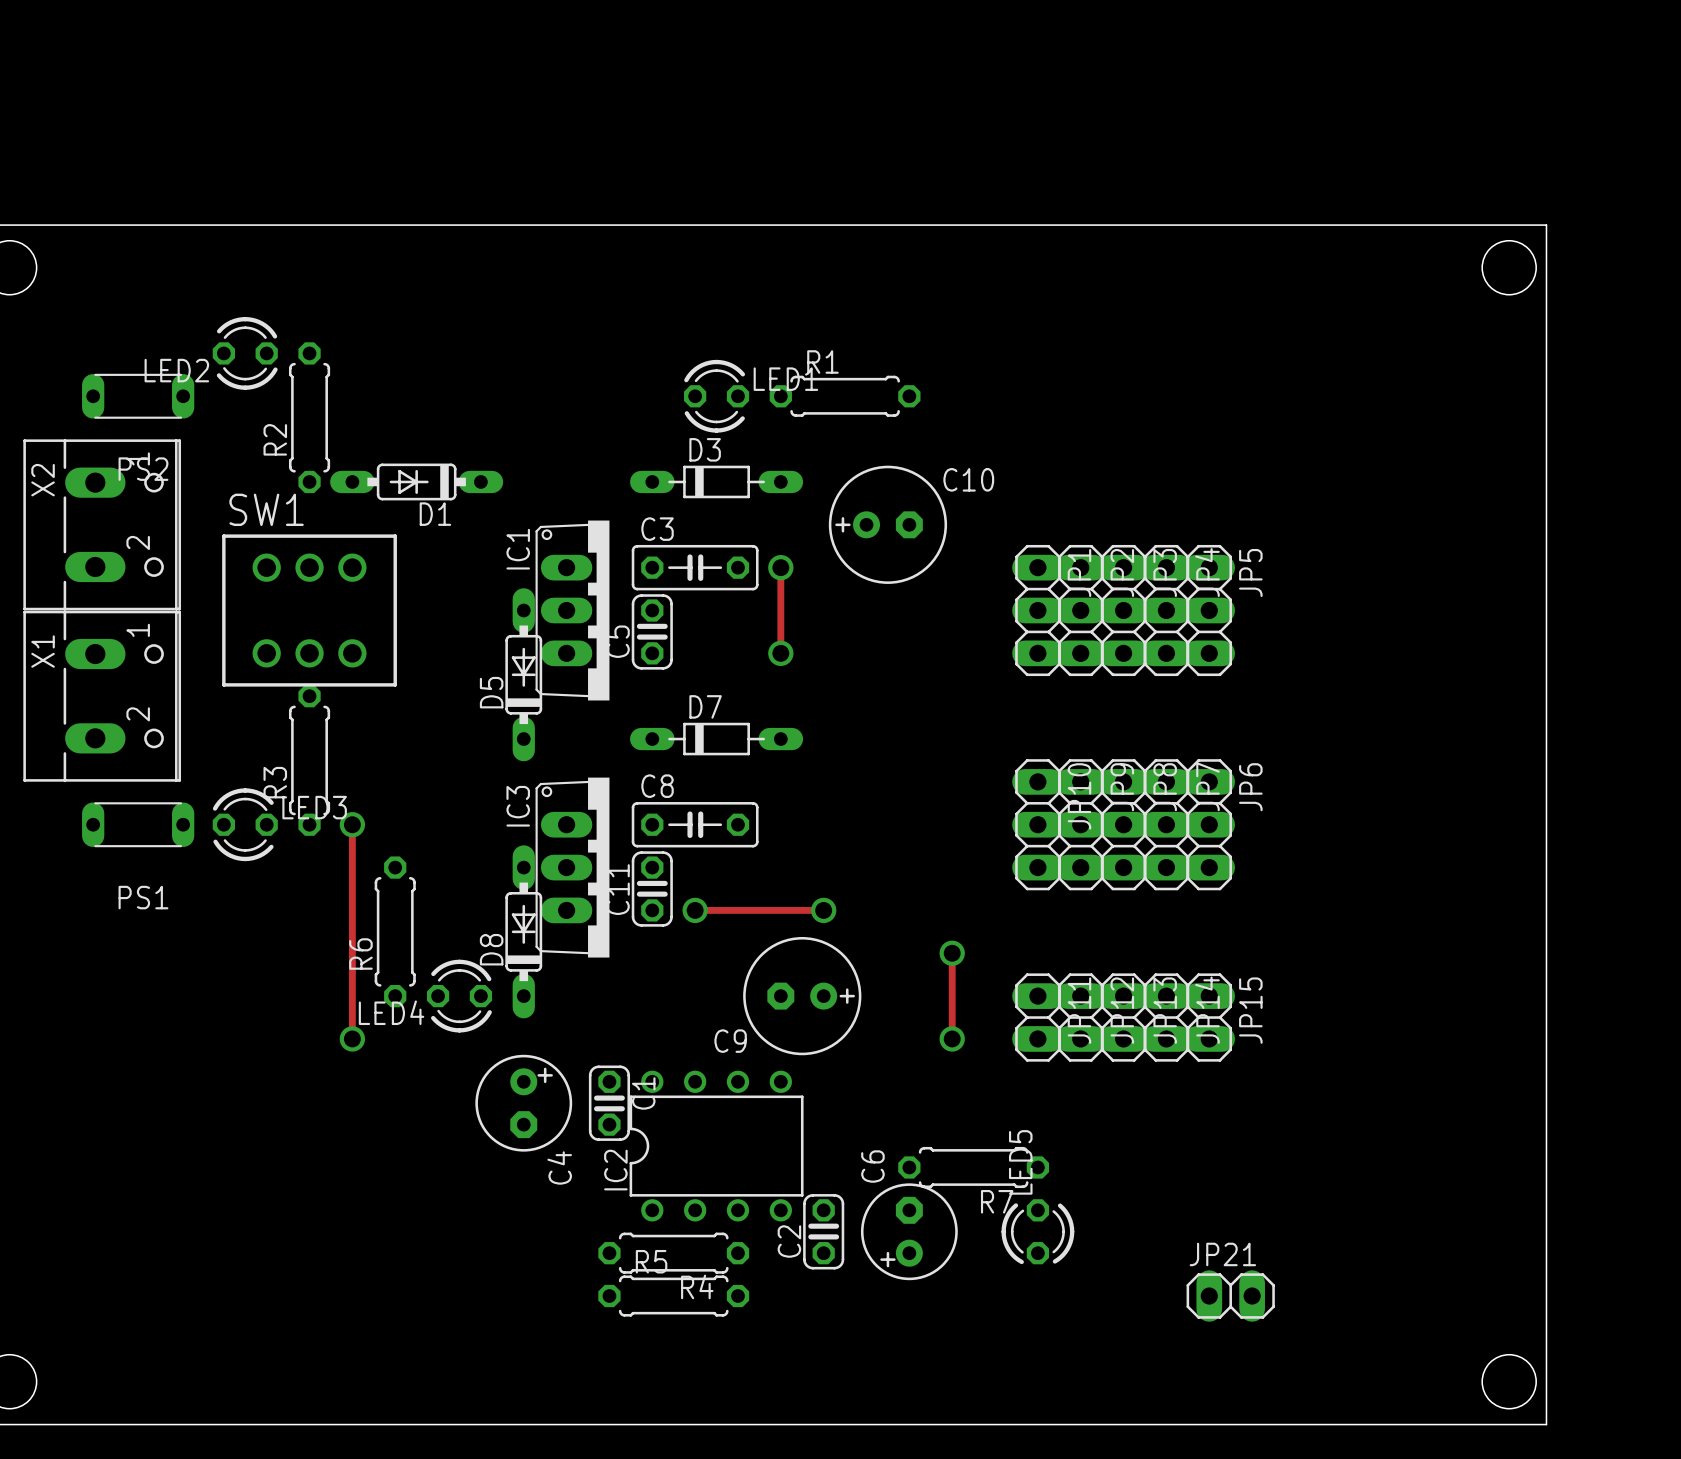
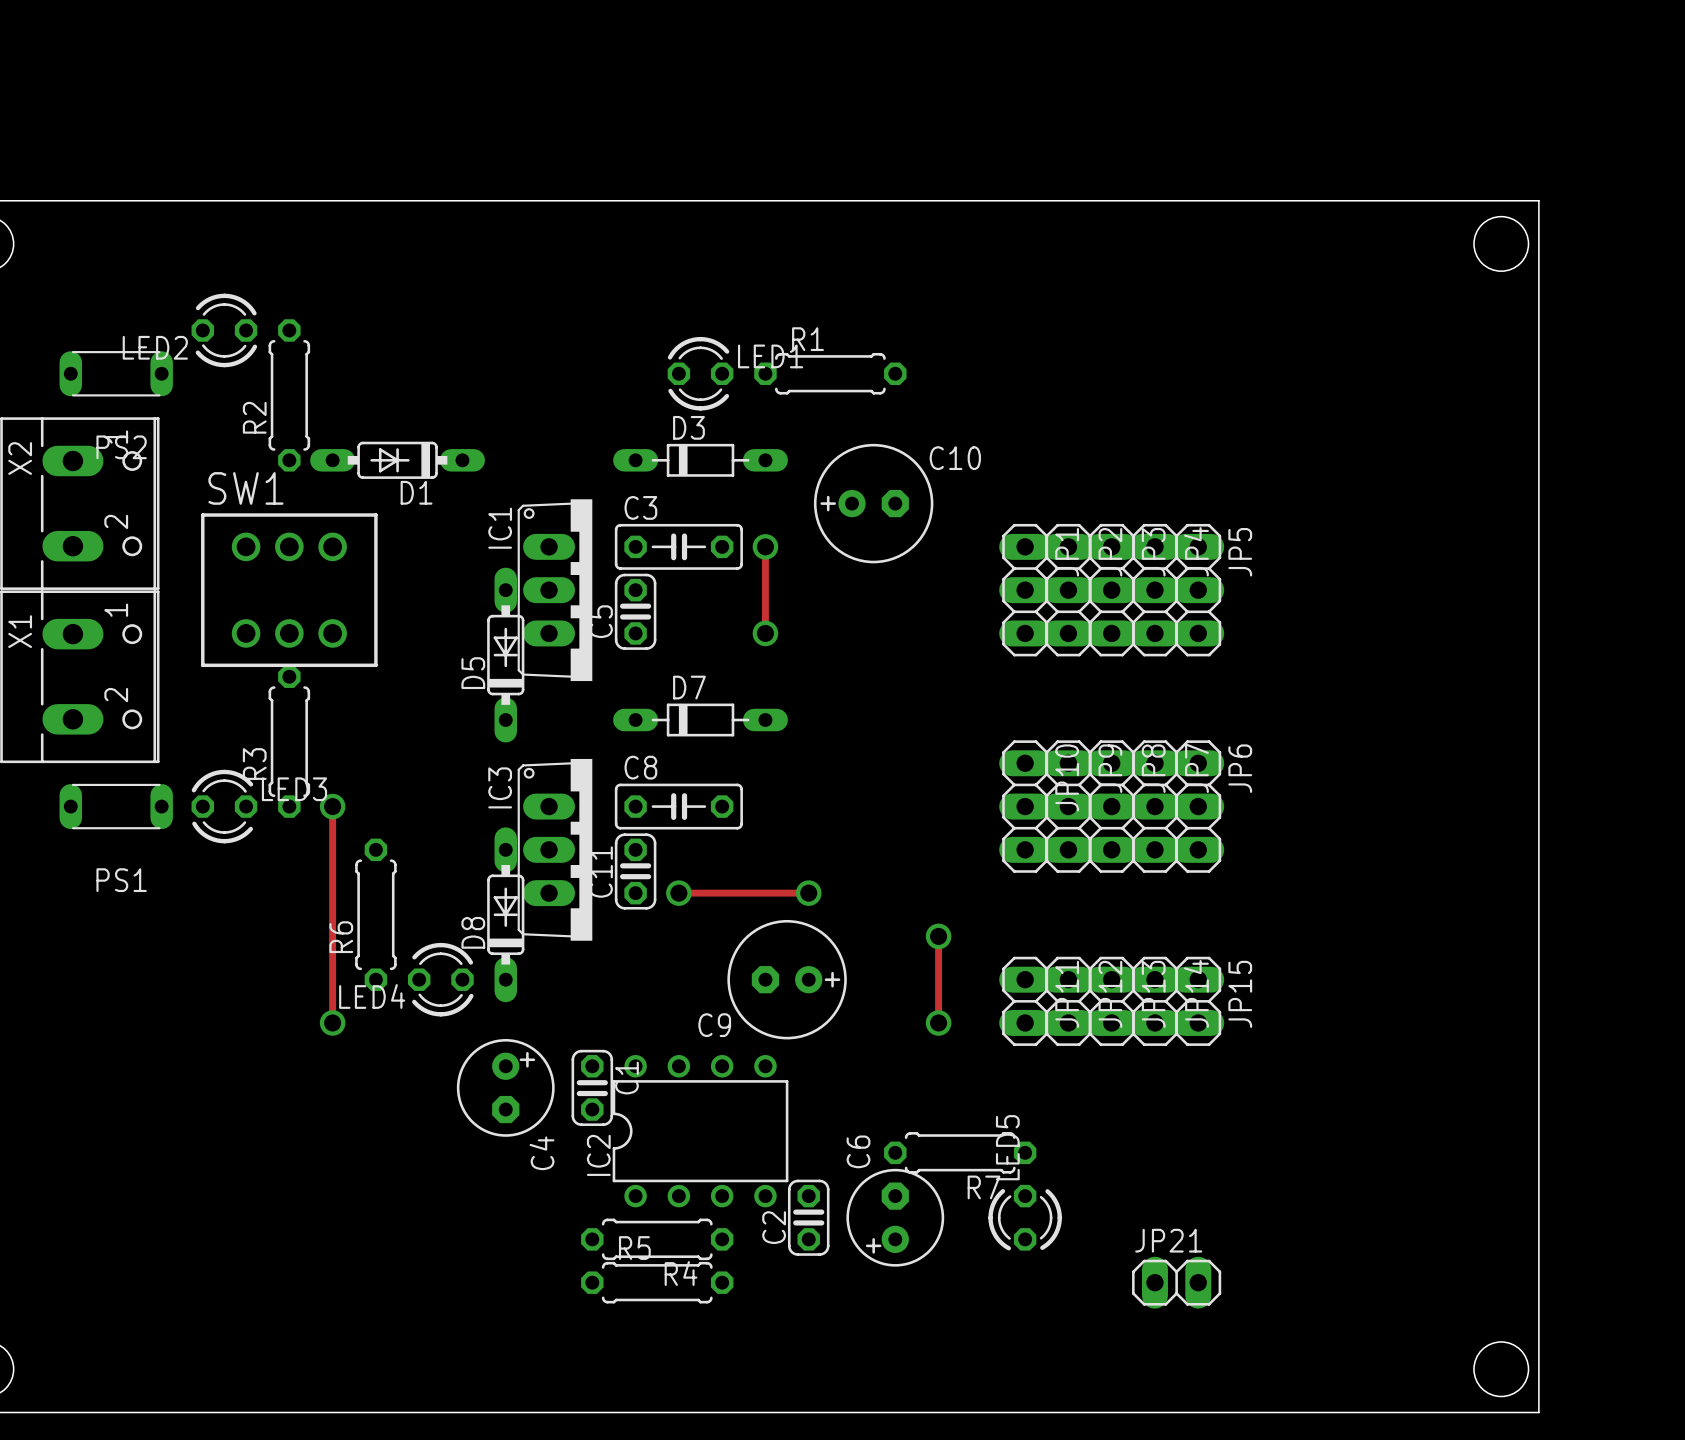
JP21 position: (1230, 1296) -> (1176, 1282)

